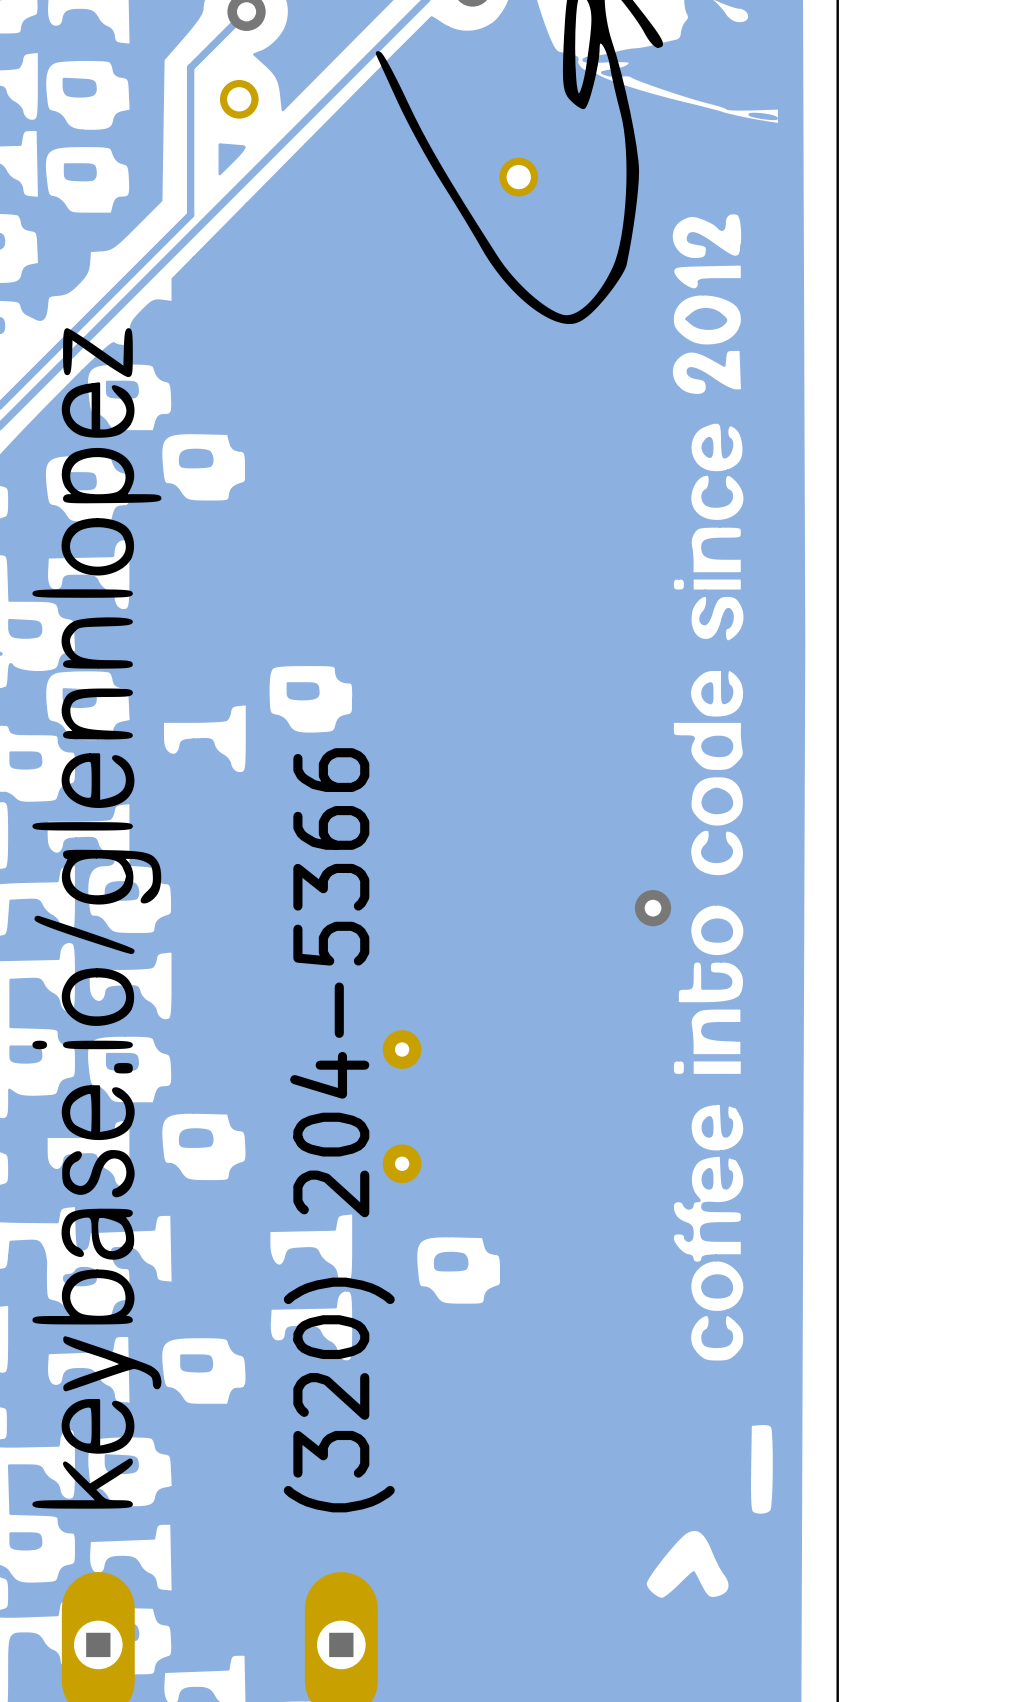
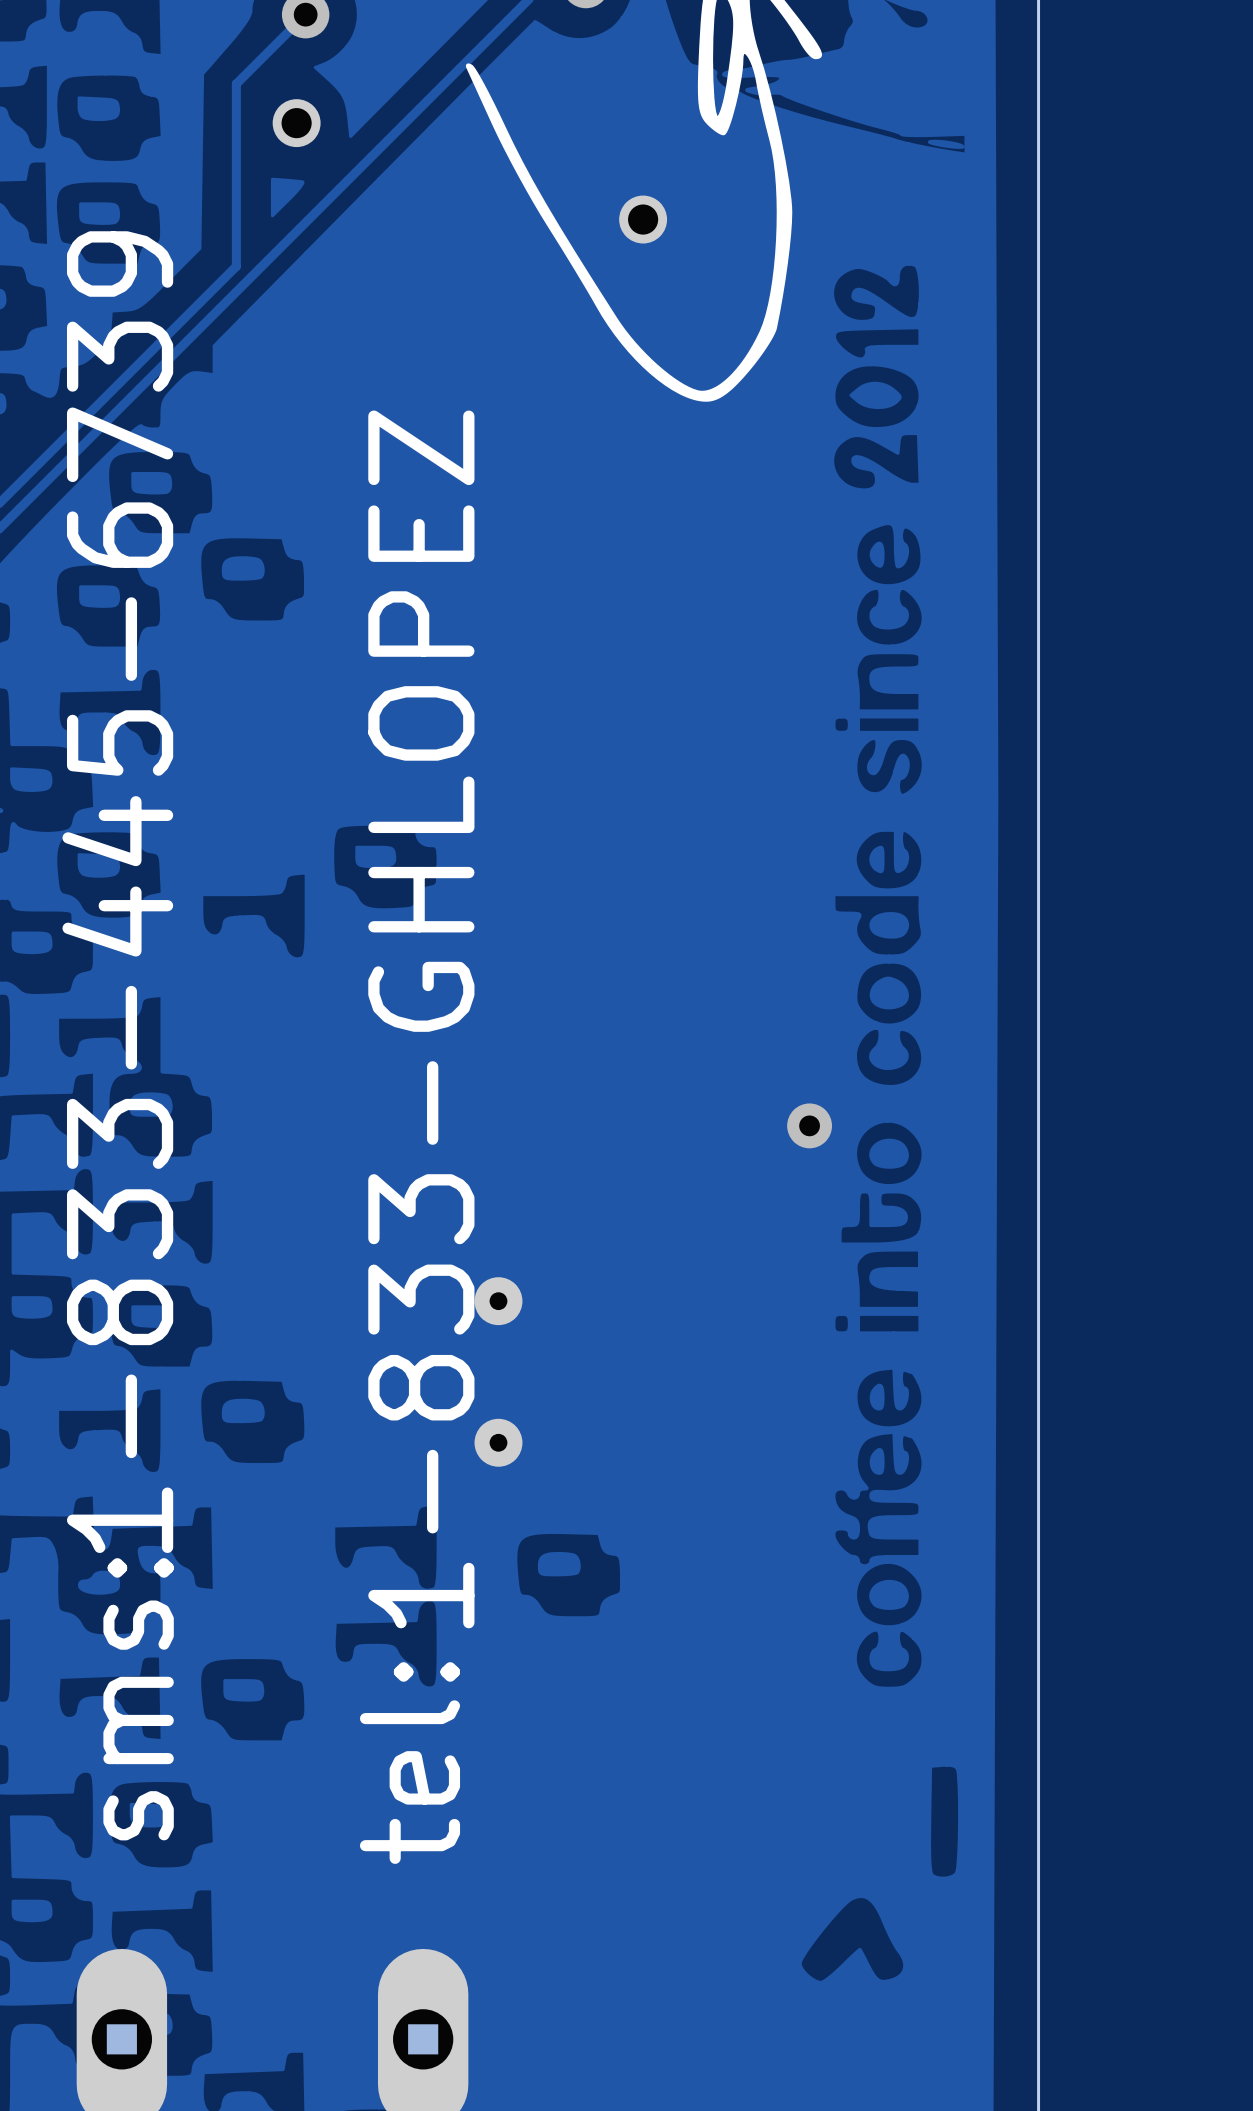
drawing: [32, 328, 162, 1509] -> none
text: none -> 1-833-445-6739 (117, 892)
part text: none -> 1-833-GHLOPEZ (421, 1019)
part text: (320) 204-5366 (339, 1130) -> none
text: none -> sms: (138, 1699)
text: none -> tel: (409, 1763)

